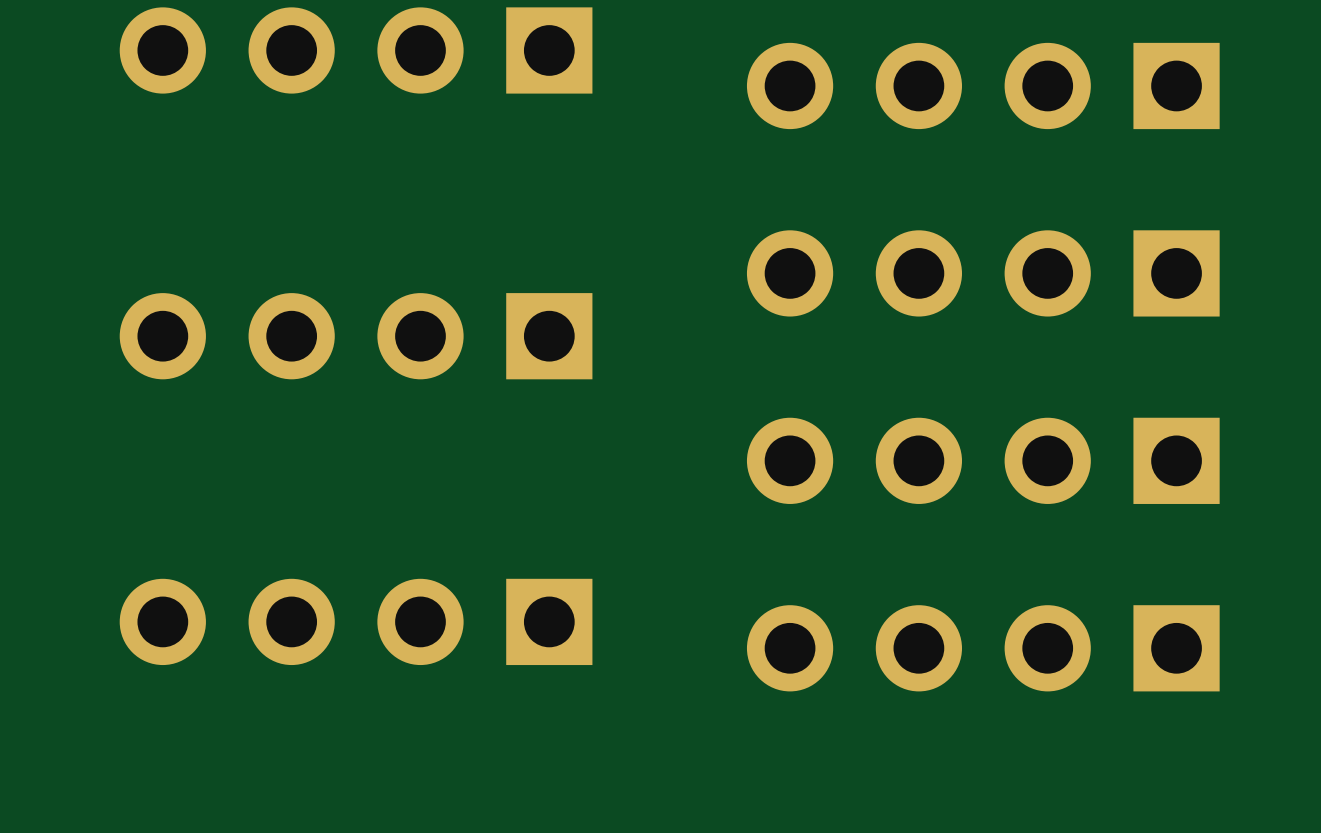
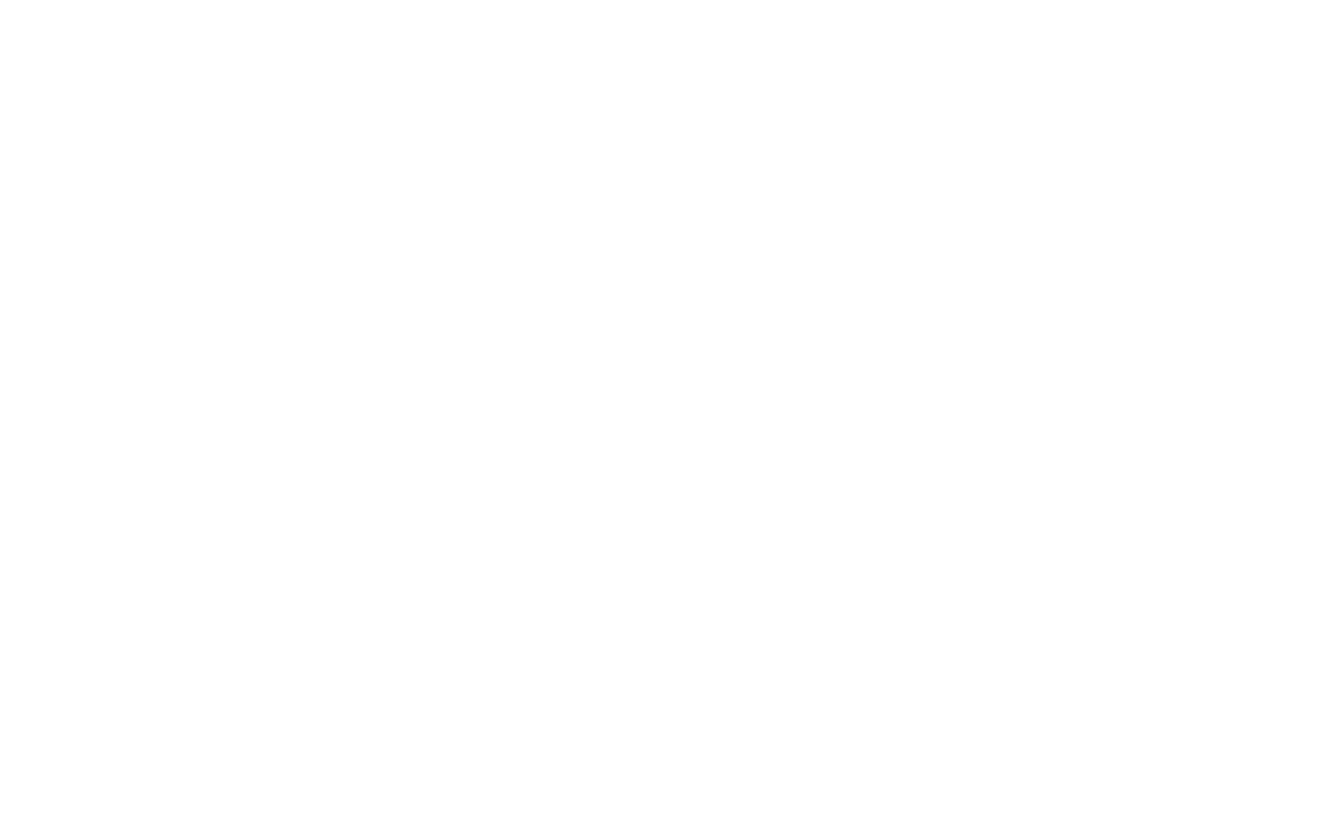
part: (356, 50) -> none
part: (983, 85) -> none
part: (983, 273) -> none
part: (356, 336) -> none
part: (983, 460) -> none
part: (356, 621) -> none
part: (983, 648) -> none

